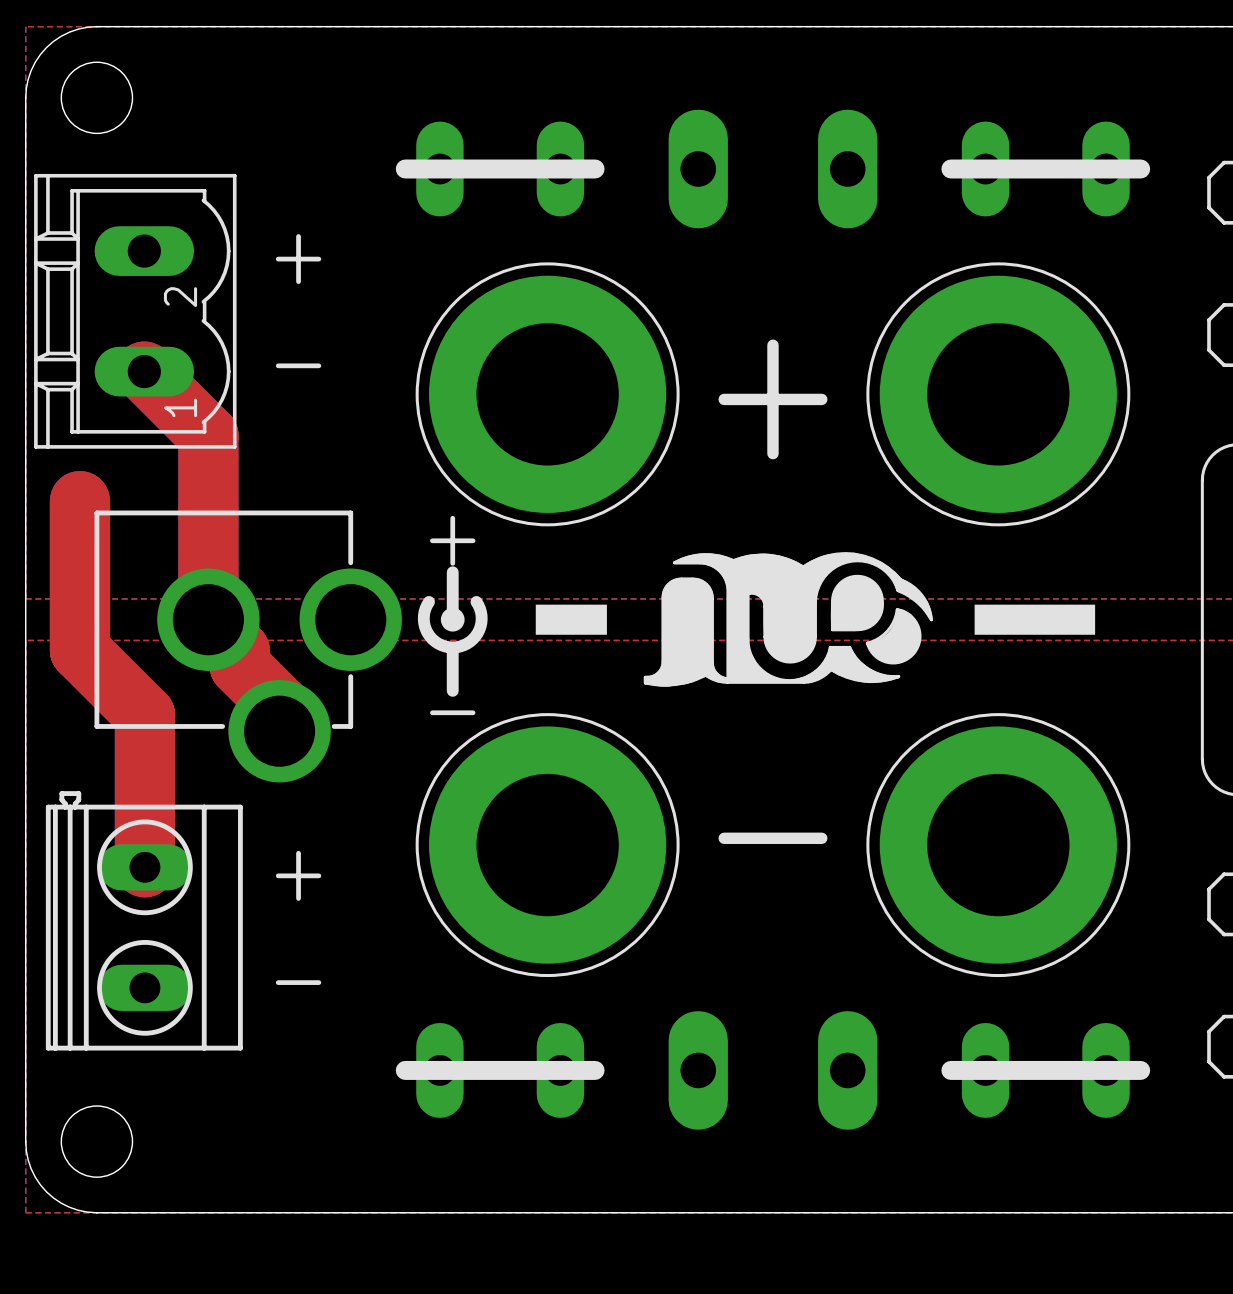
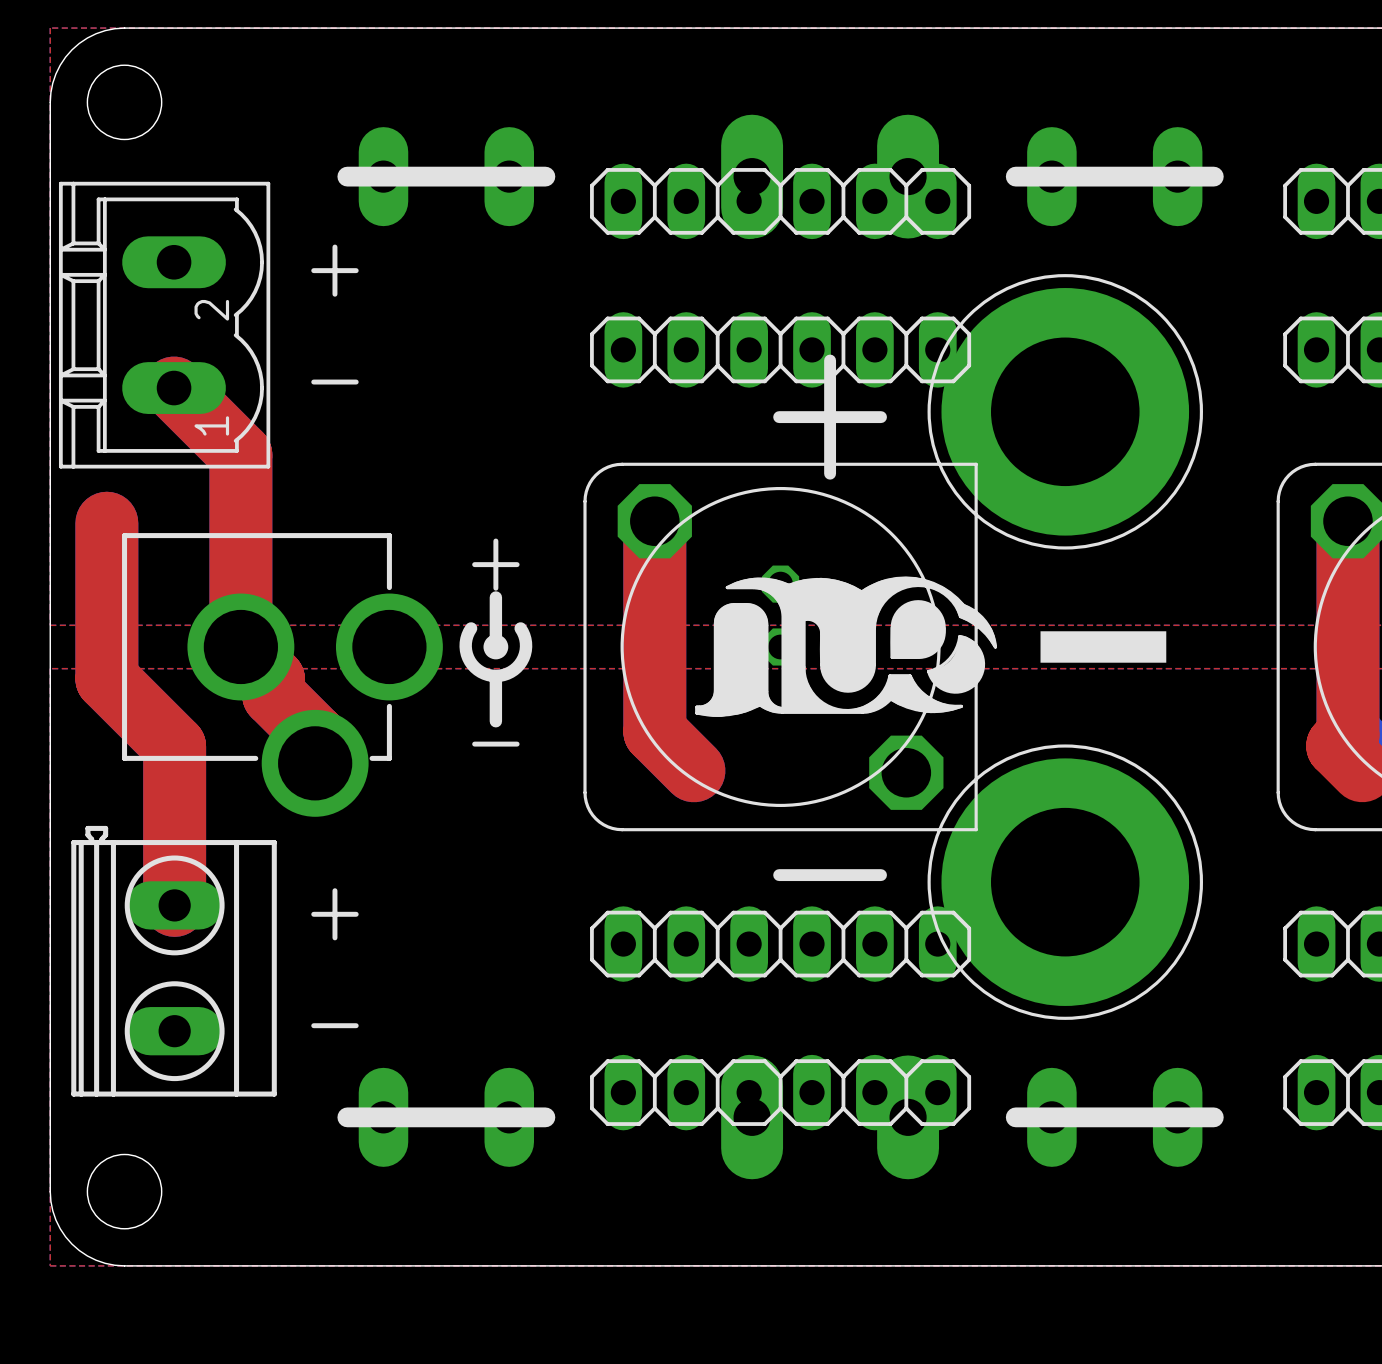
part position: (500, 168) -> (446, 176)
part: none -> (780, 201)
part: none -> (780, 349)
part: (547, 394) -> none
top track: none -> (654, 521) (654, 731) (693, 770)
line: (535, 619) (606, 619) -> none
part: none -> (780, 646)
part: (547, 845) -> none
part: none -> (780, 944)
part: none -> (780, 1092)
part position: (500, 1070) -> (446, 1117)

